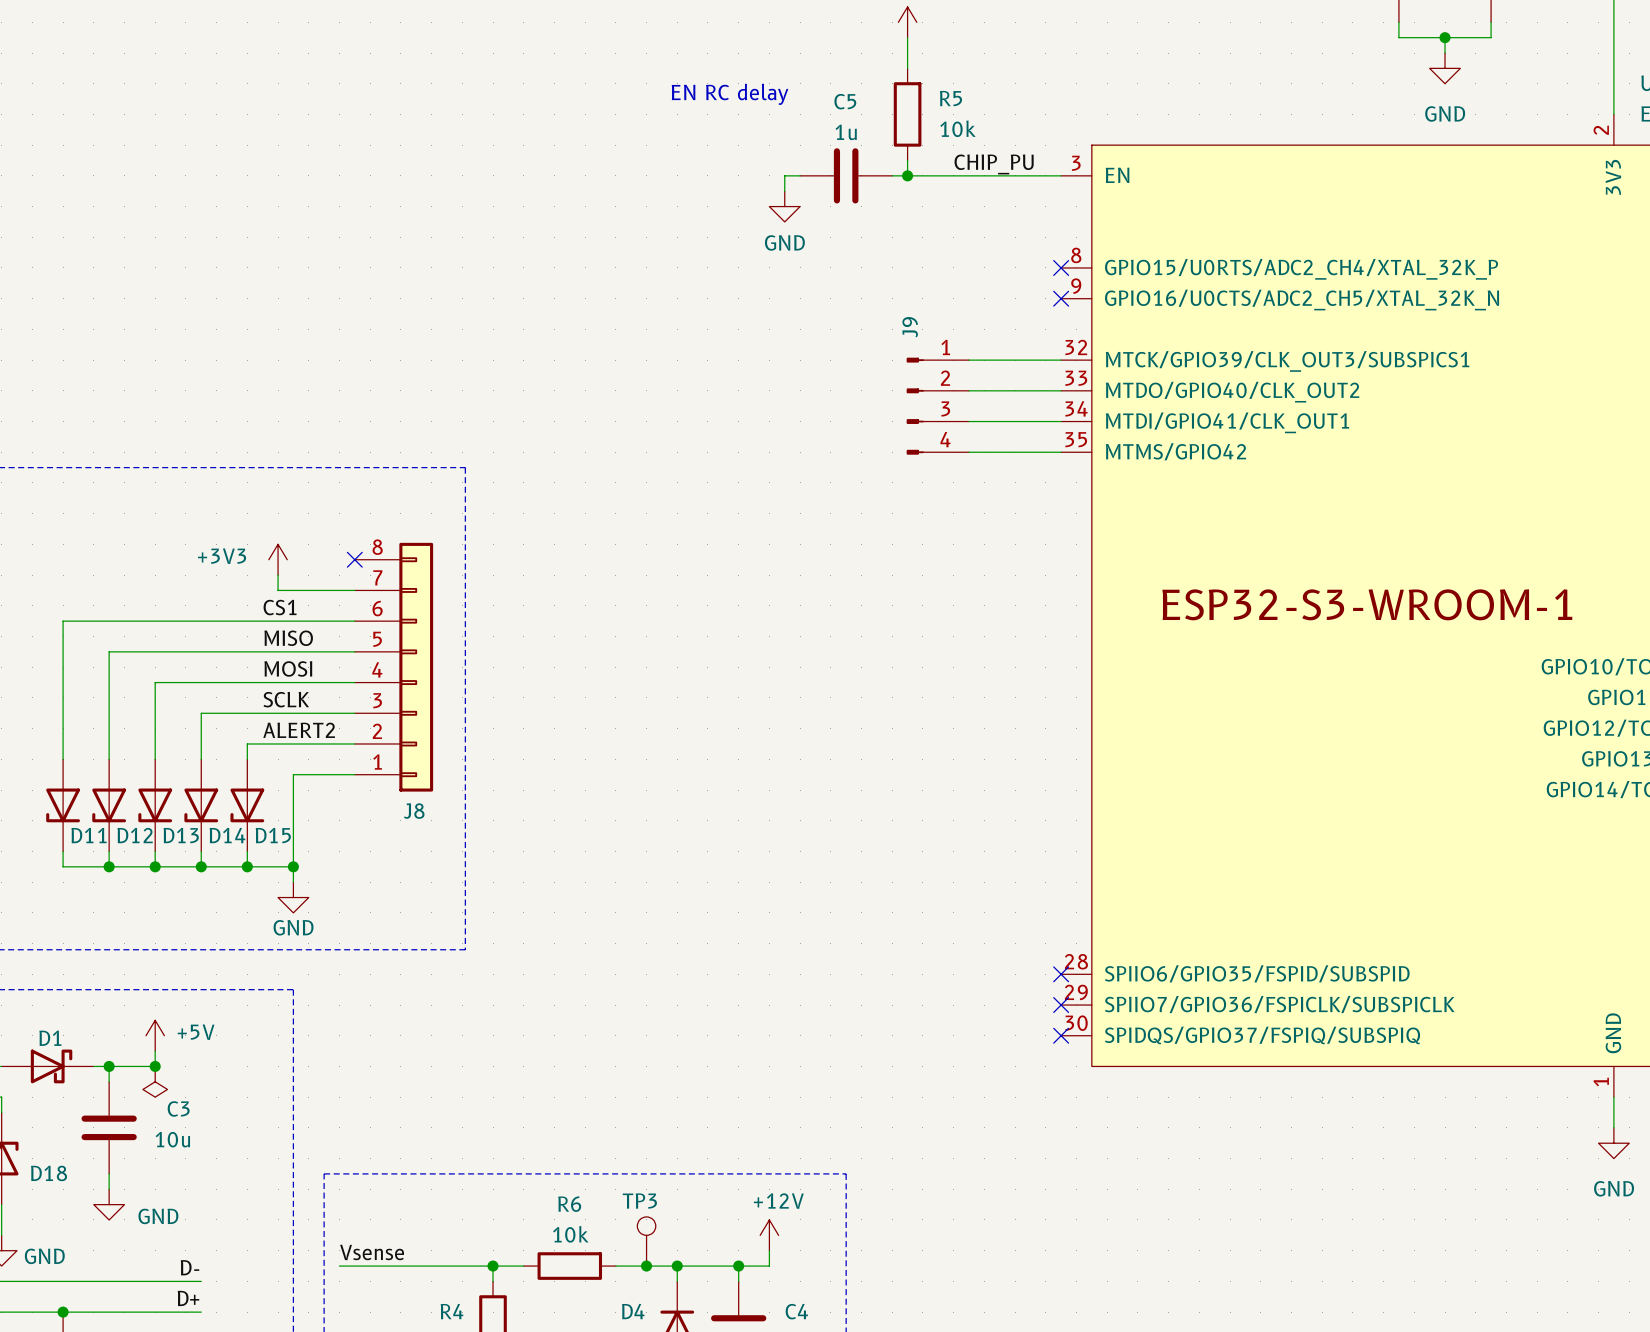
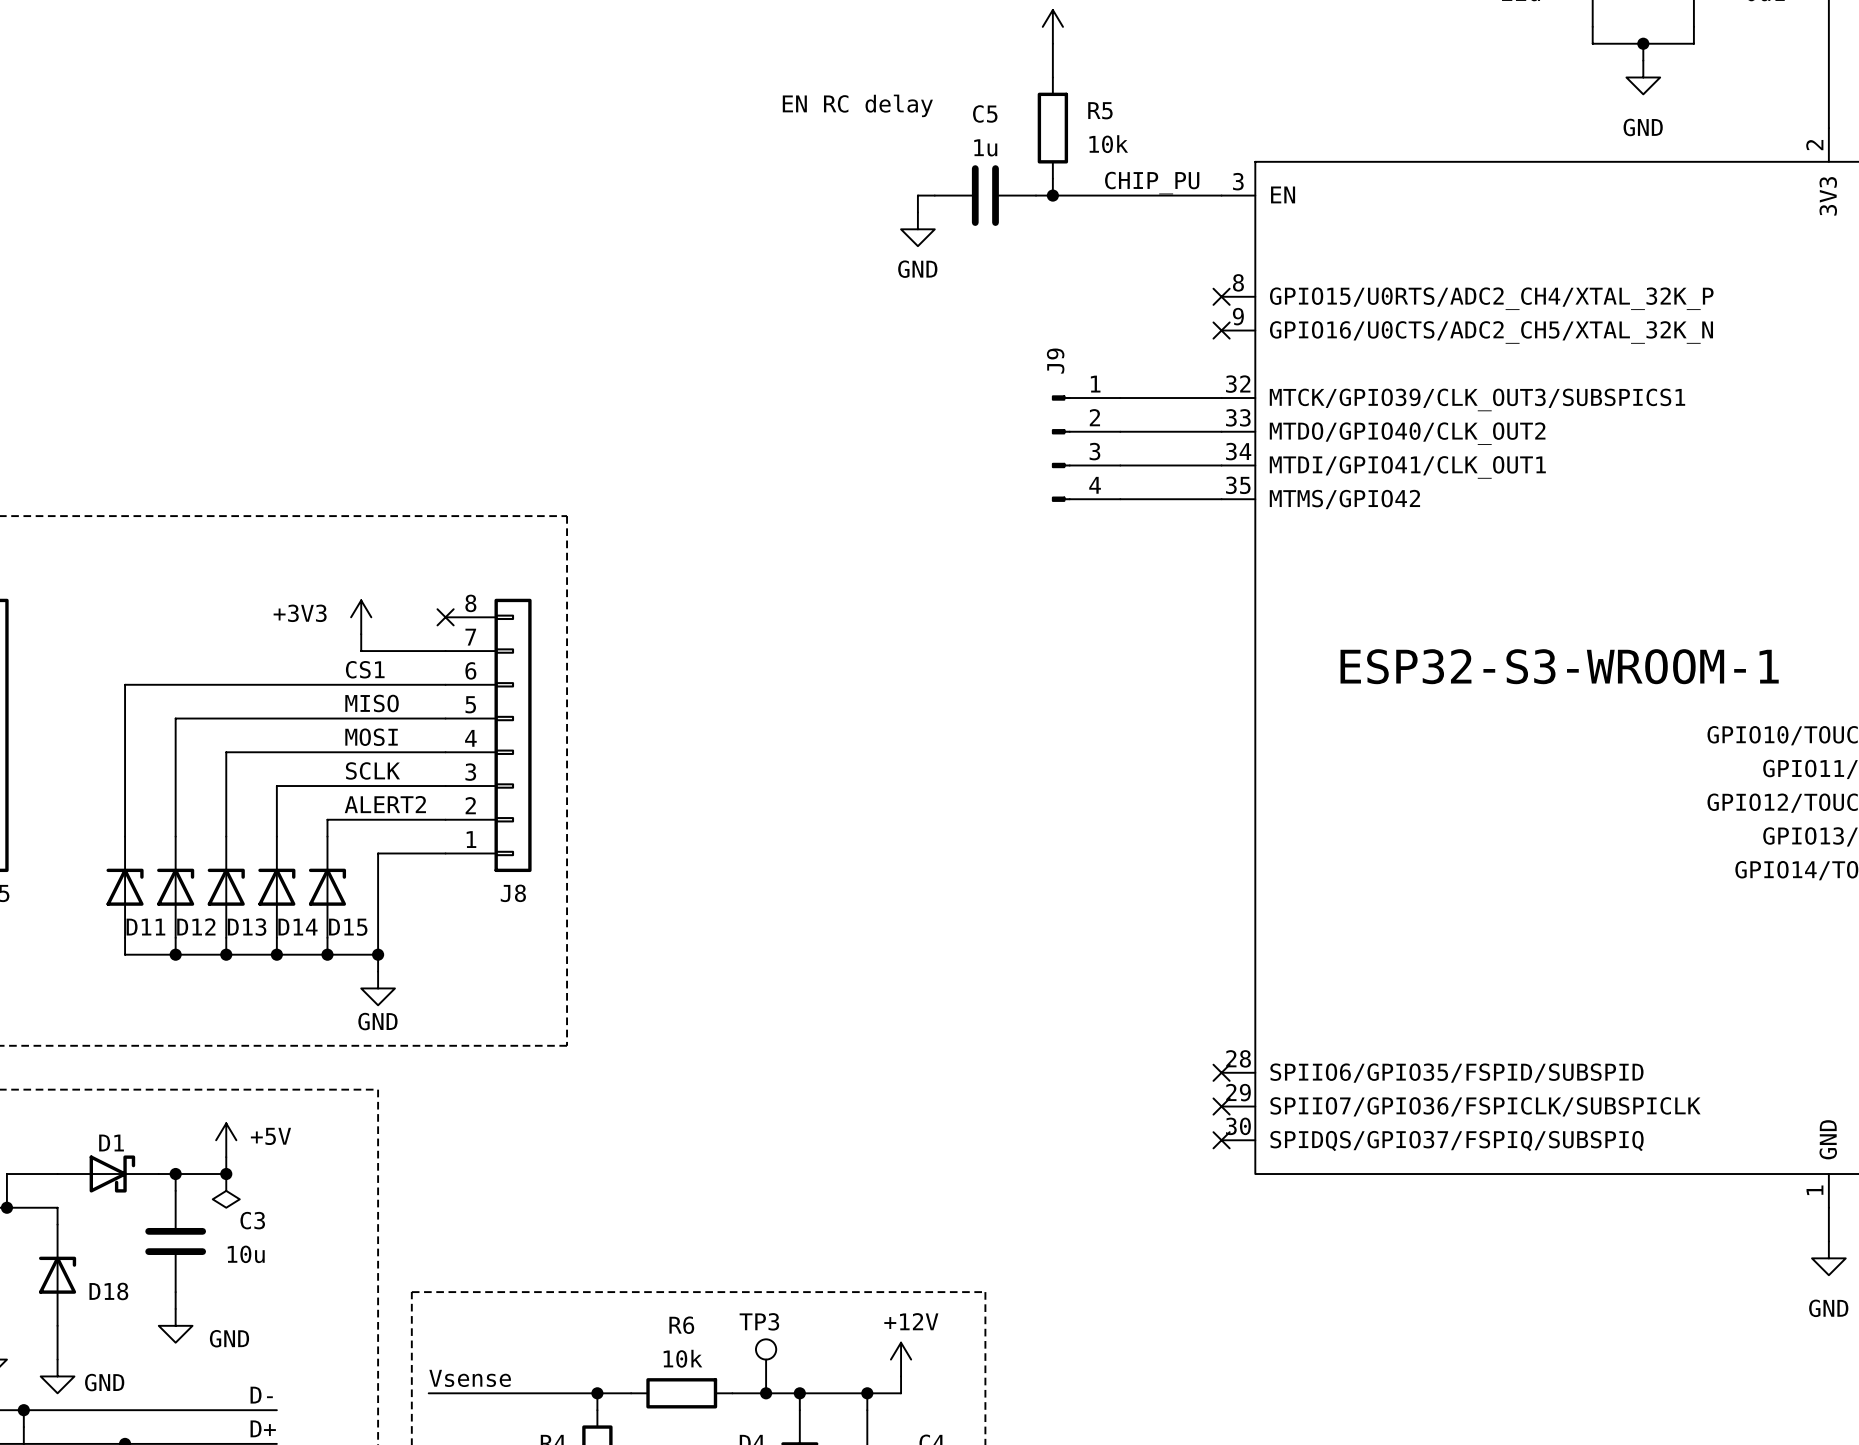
D11 rotation: 0° (63, 805) -> 180° (125, 887)
D12 rotation: 0° (109, 805) -> 180° (175, 887)
D13 rotation: 0° (155, 805) -> 180° (226, 887)
D14 rotation: 0° (201, 805) -> 180° (276, 887)
D15 rotation: 0° (247, 805) -> 180° (327, 887)

